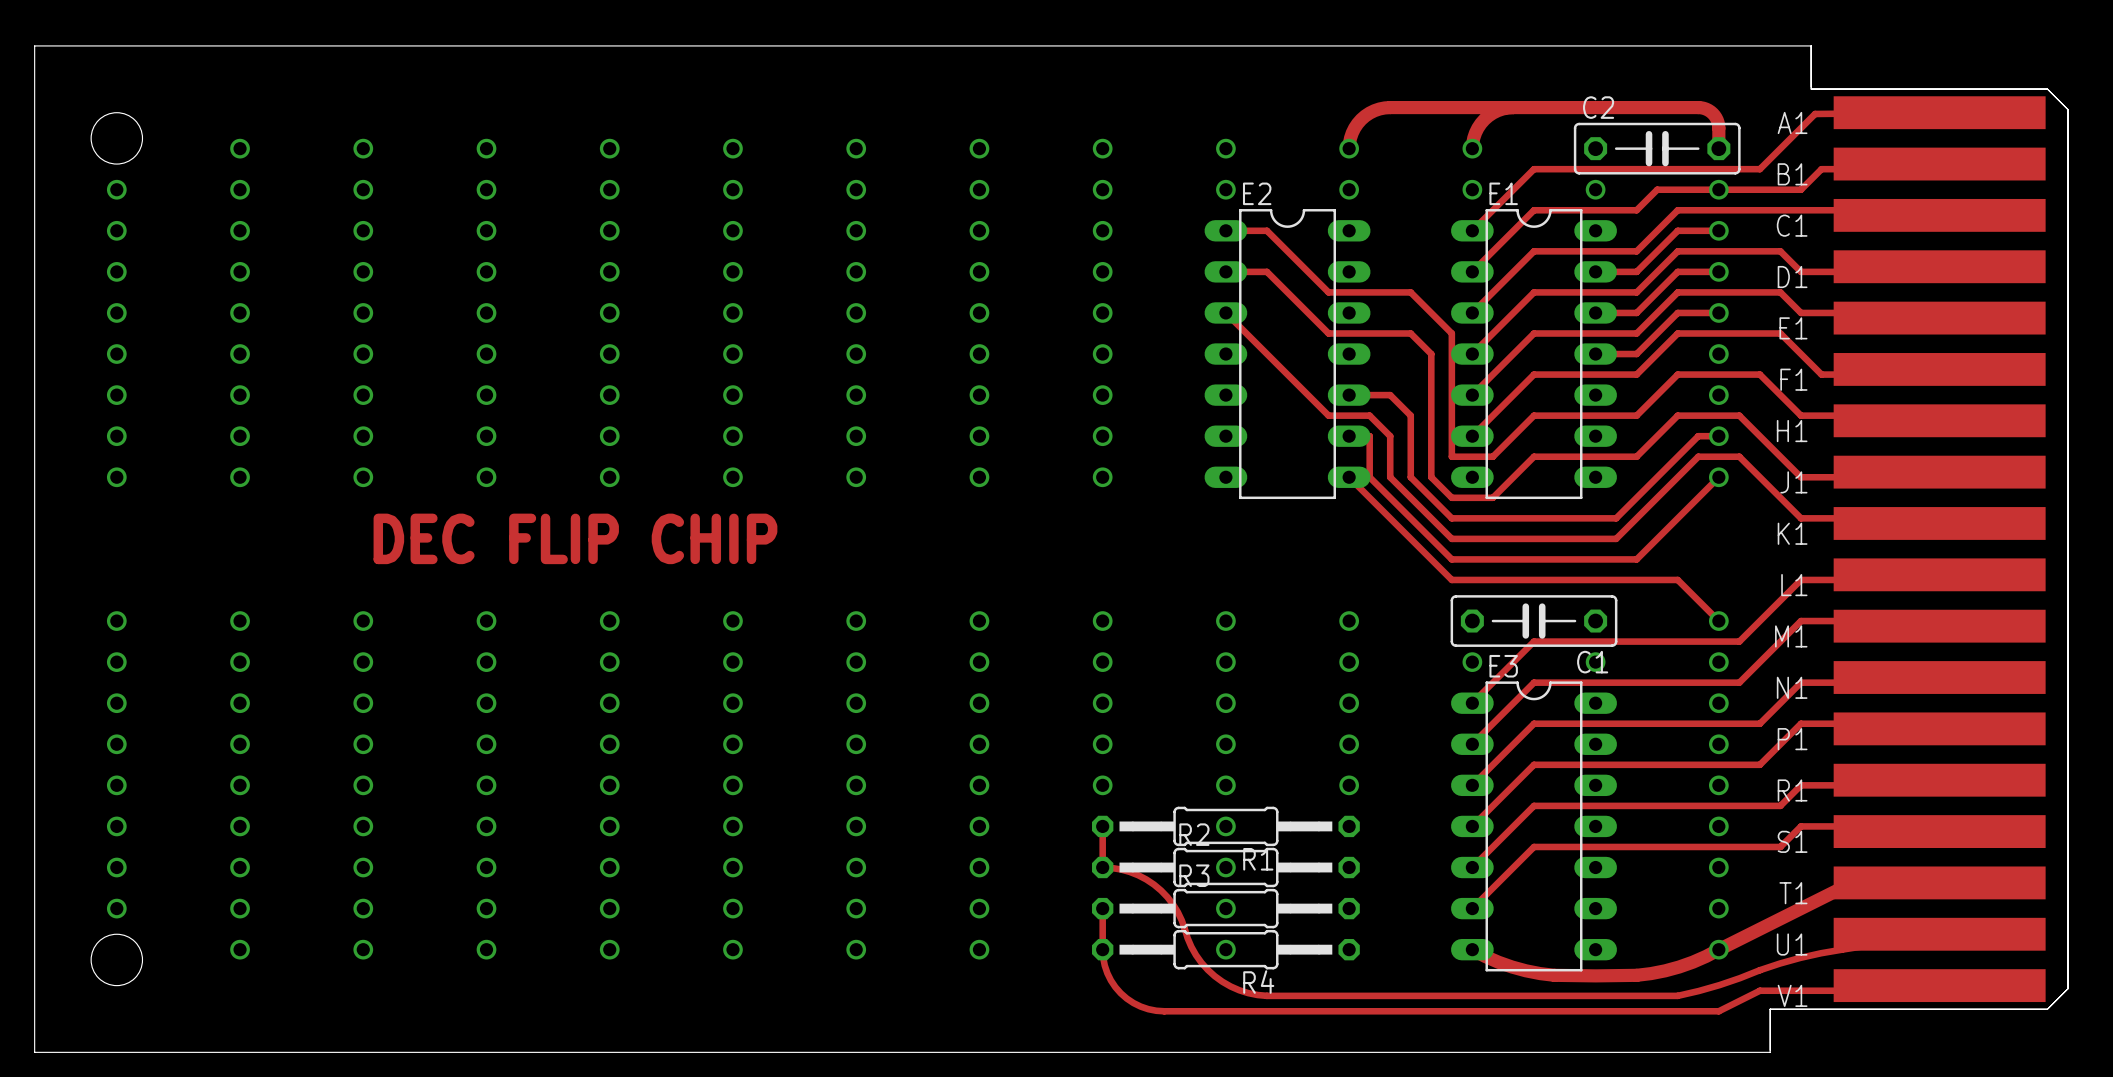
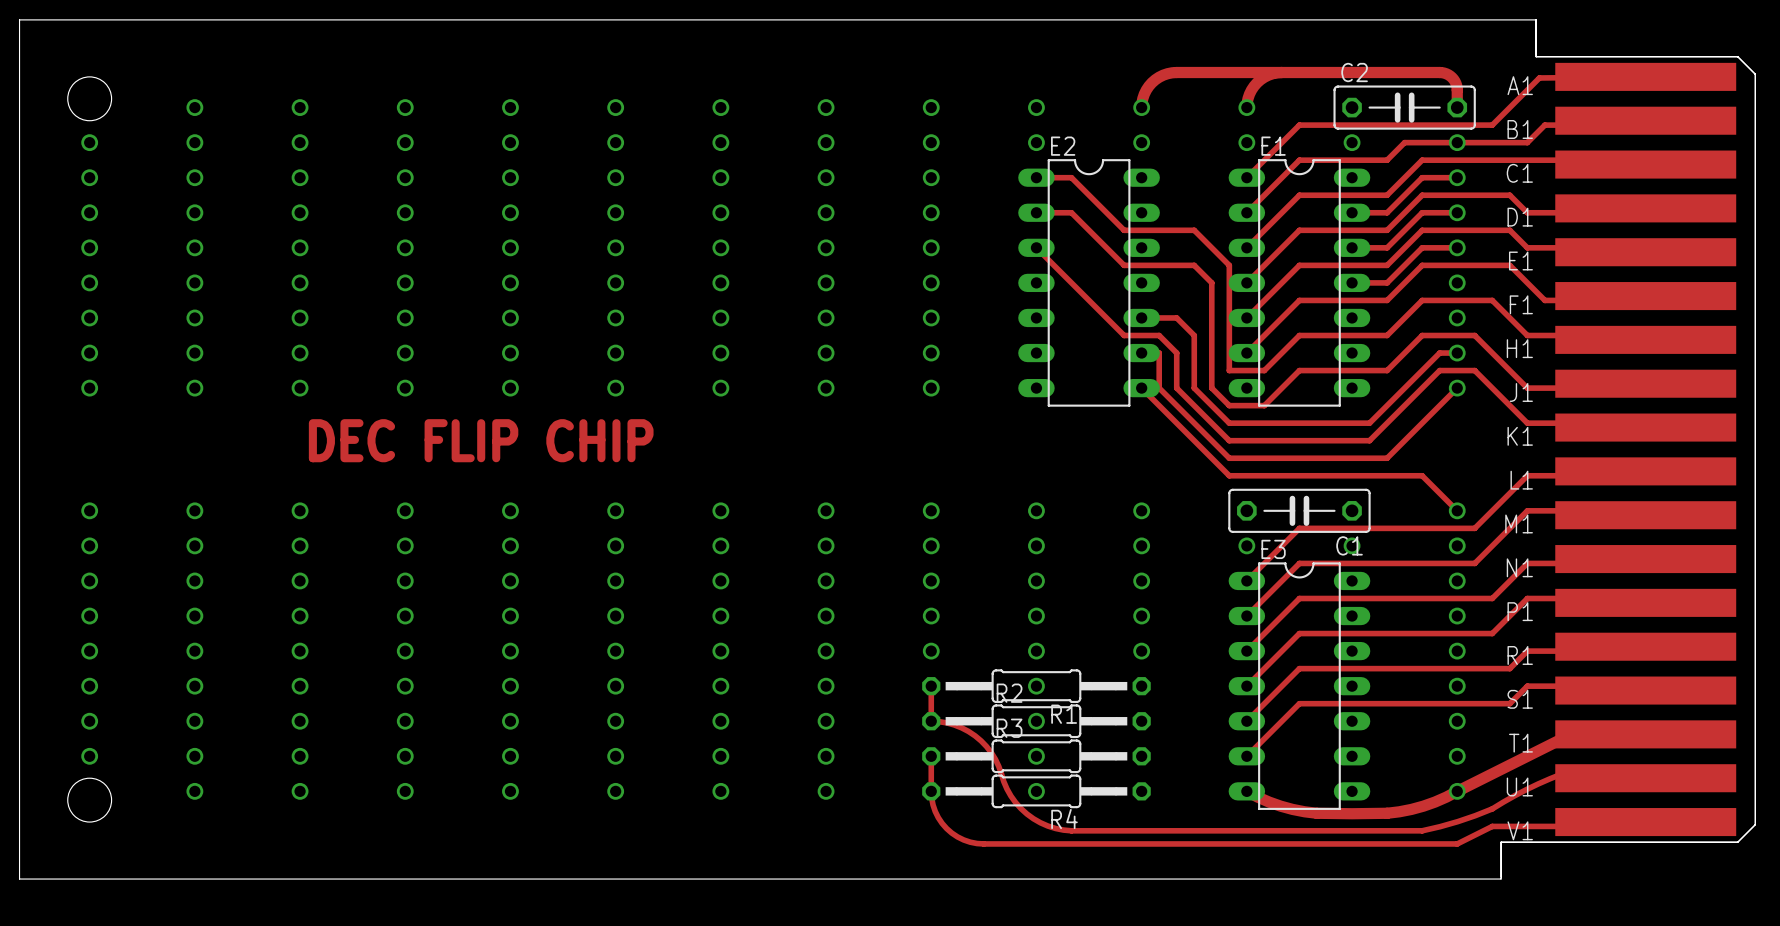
track: (1939, 934) (1821, 953) (1759, 970) -> (1645, 778) (1562, 773) (1526, 789) (1492, 808)

